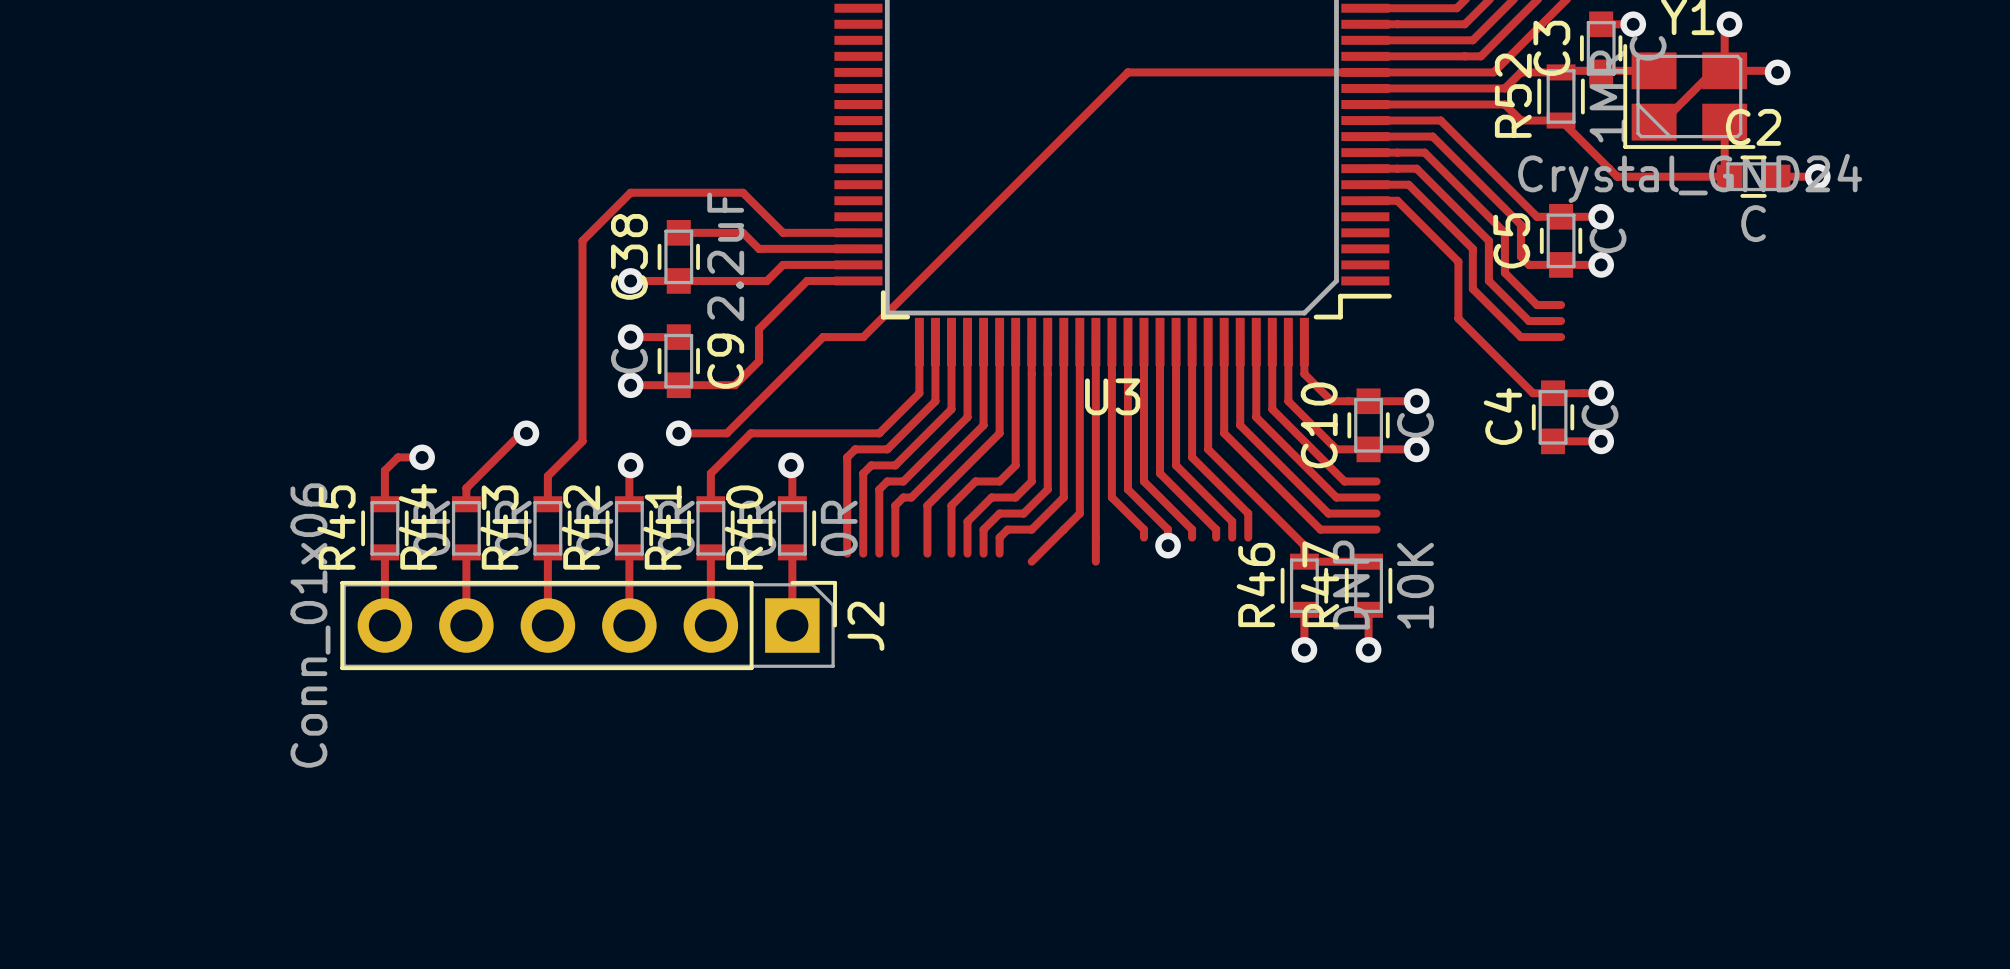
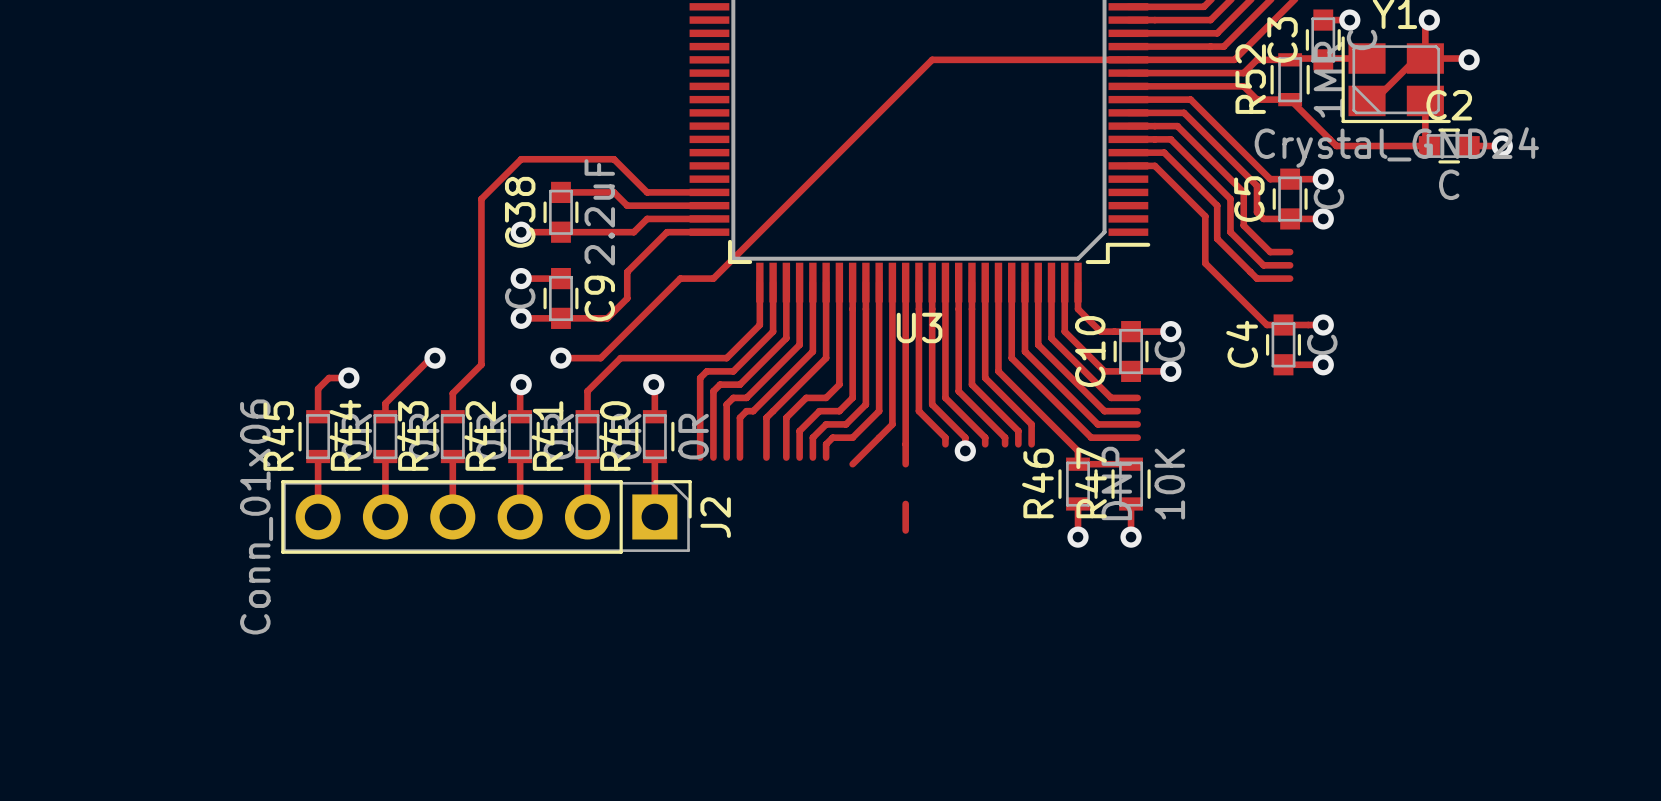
track: none -> (905, 503) (905, 530)

